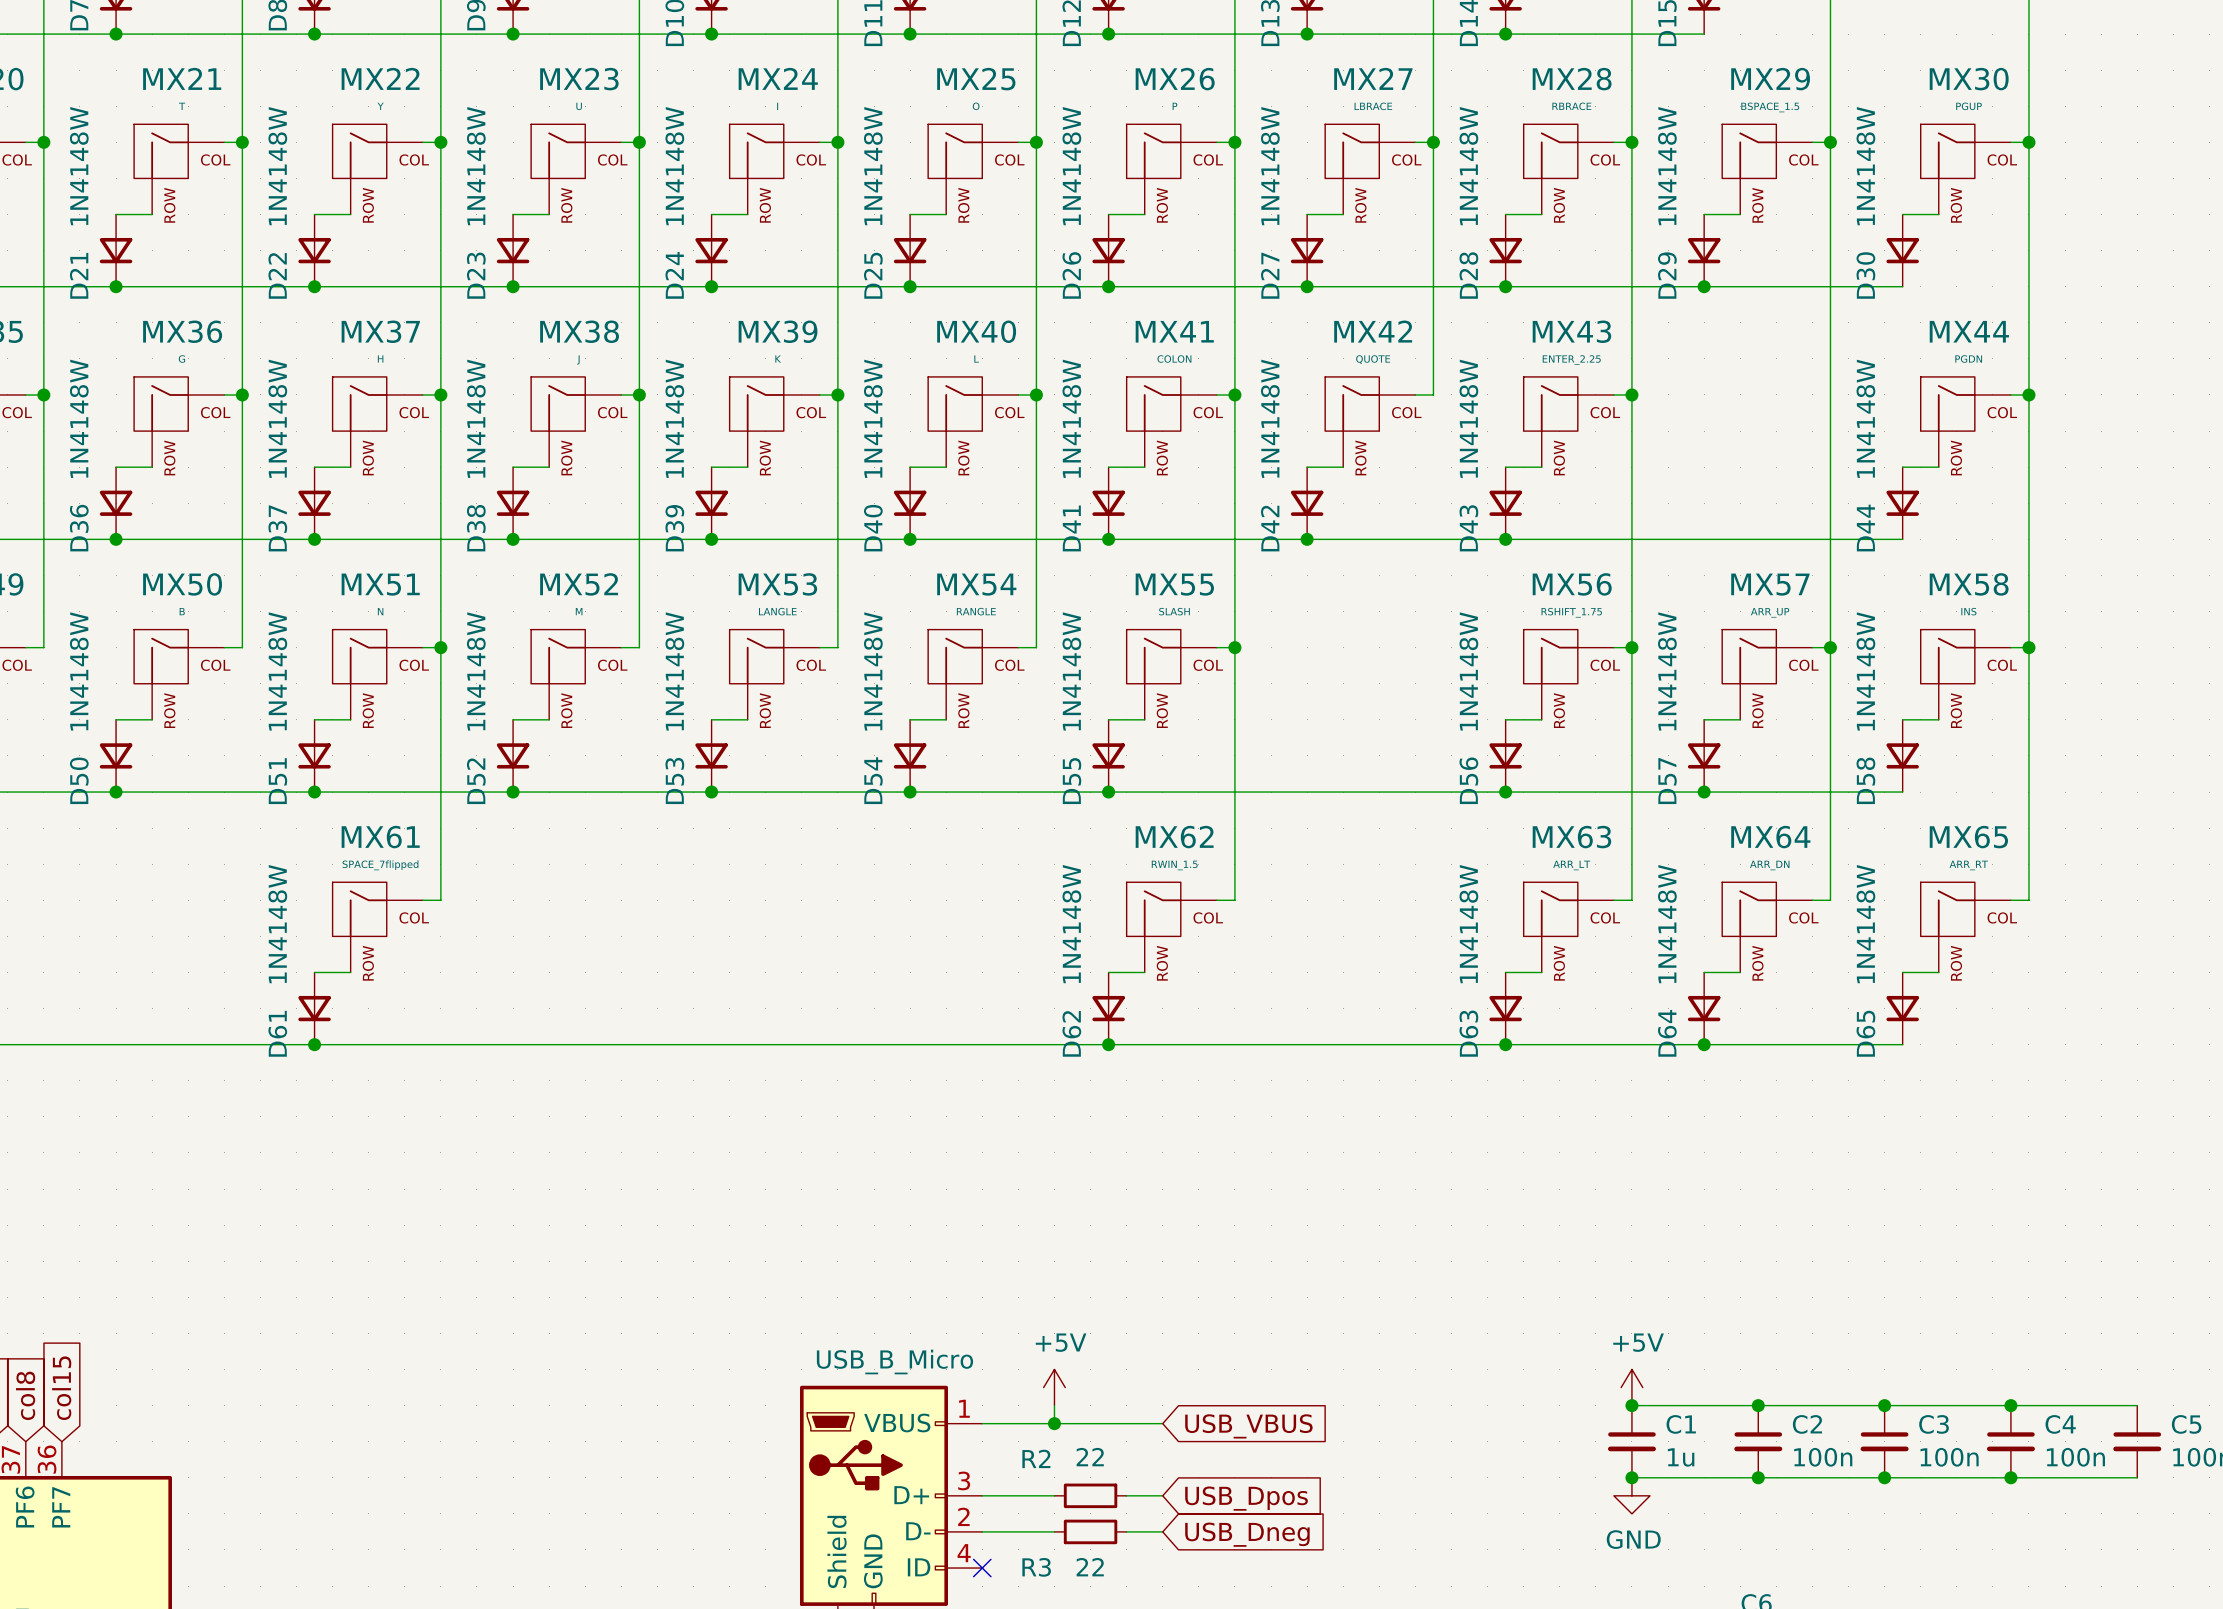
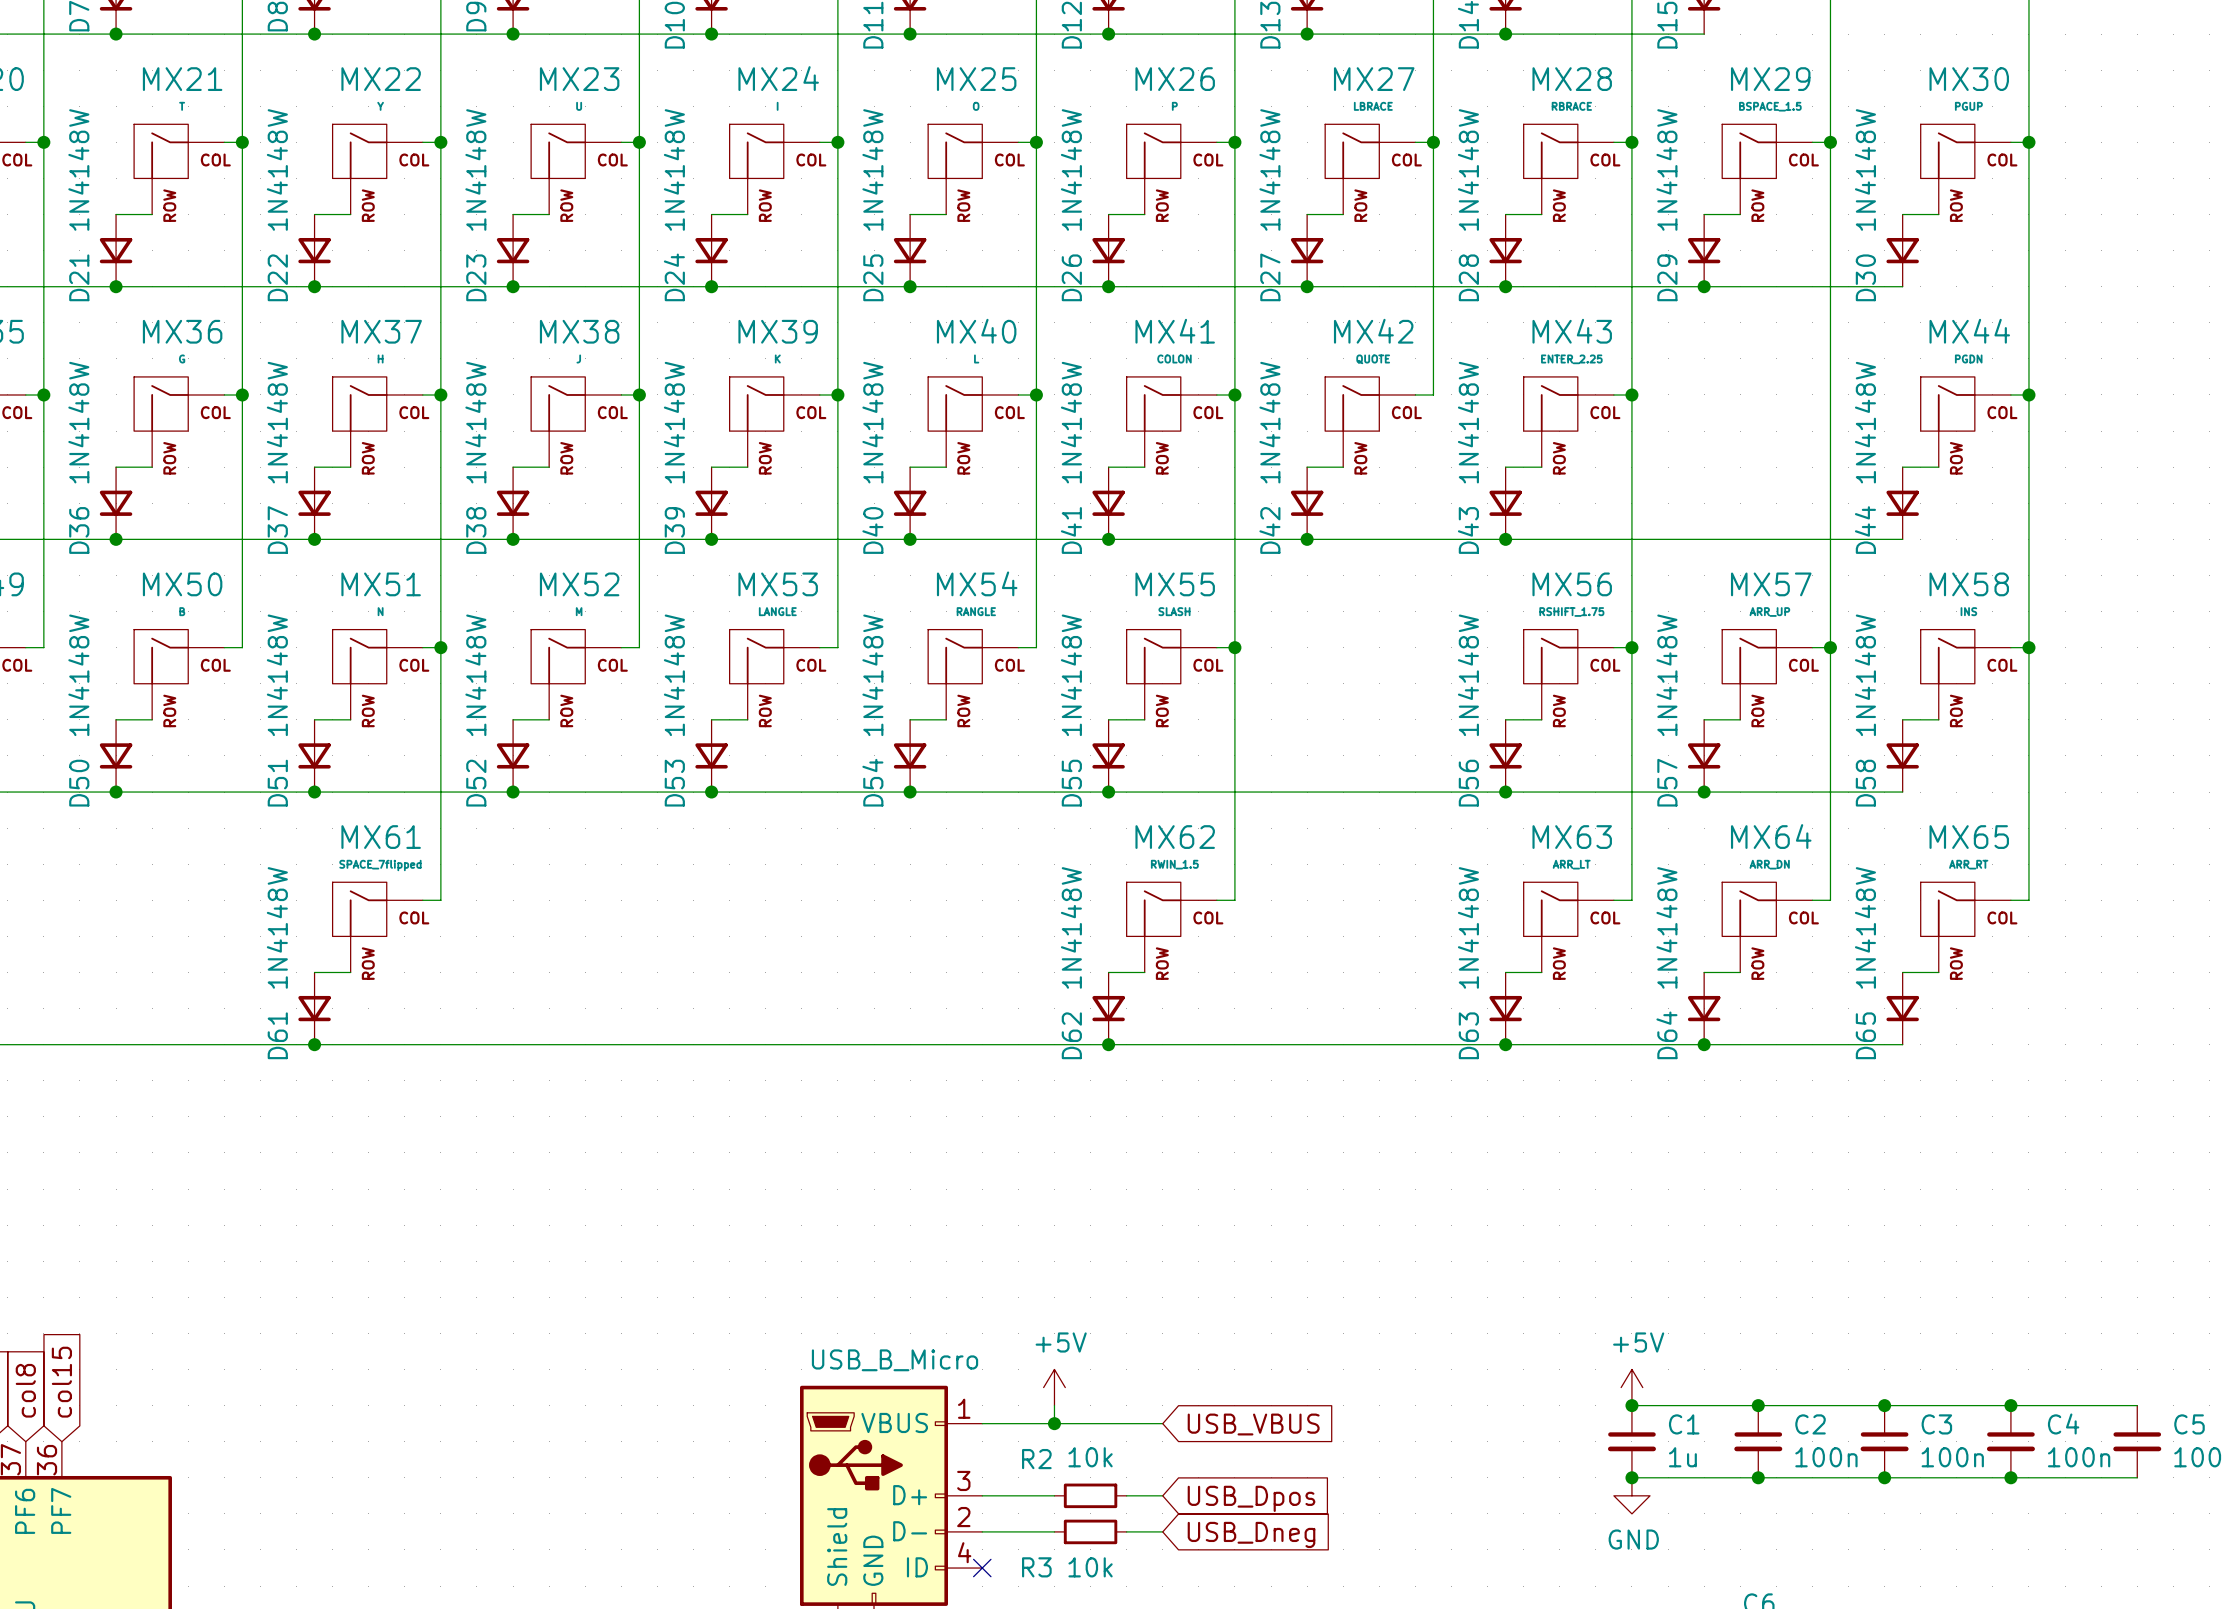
R2 value: 22 (1090, 1457) -> 10k (1090, 1457)
R3 value: 22 (1090, 1567) -> 10k (1090, 1567)

